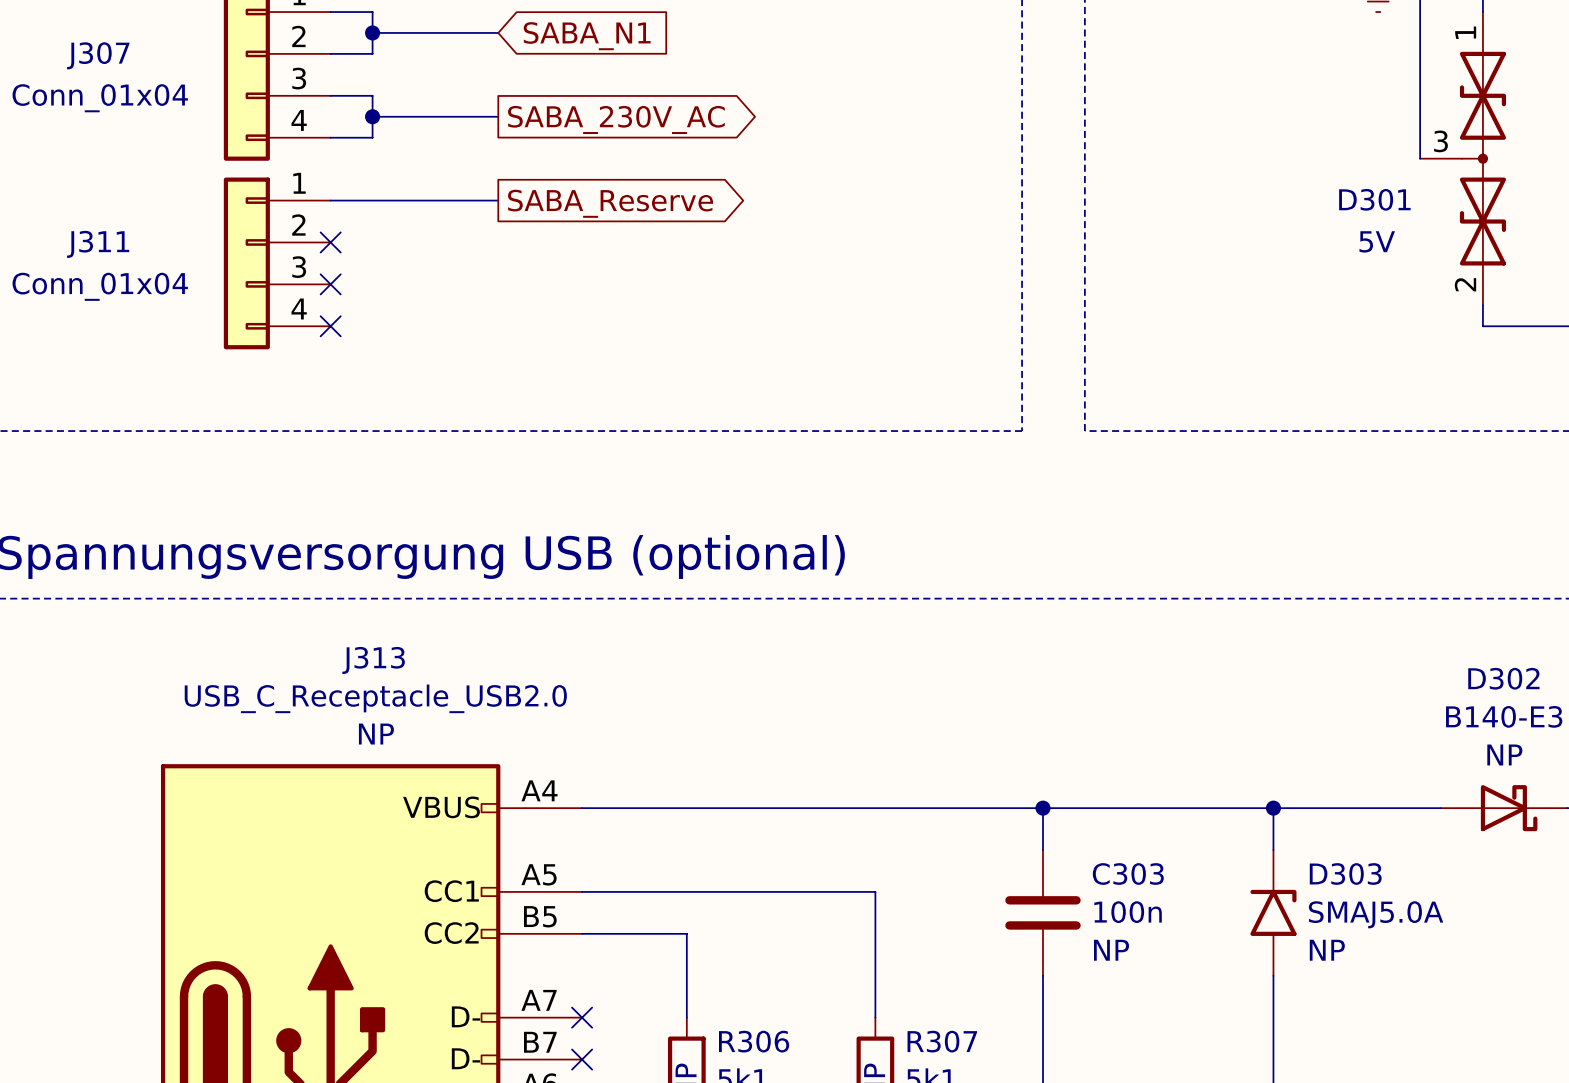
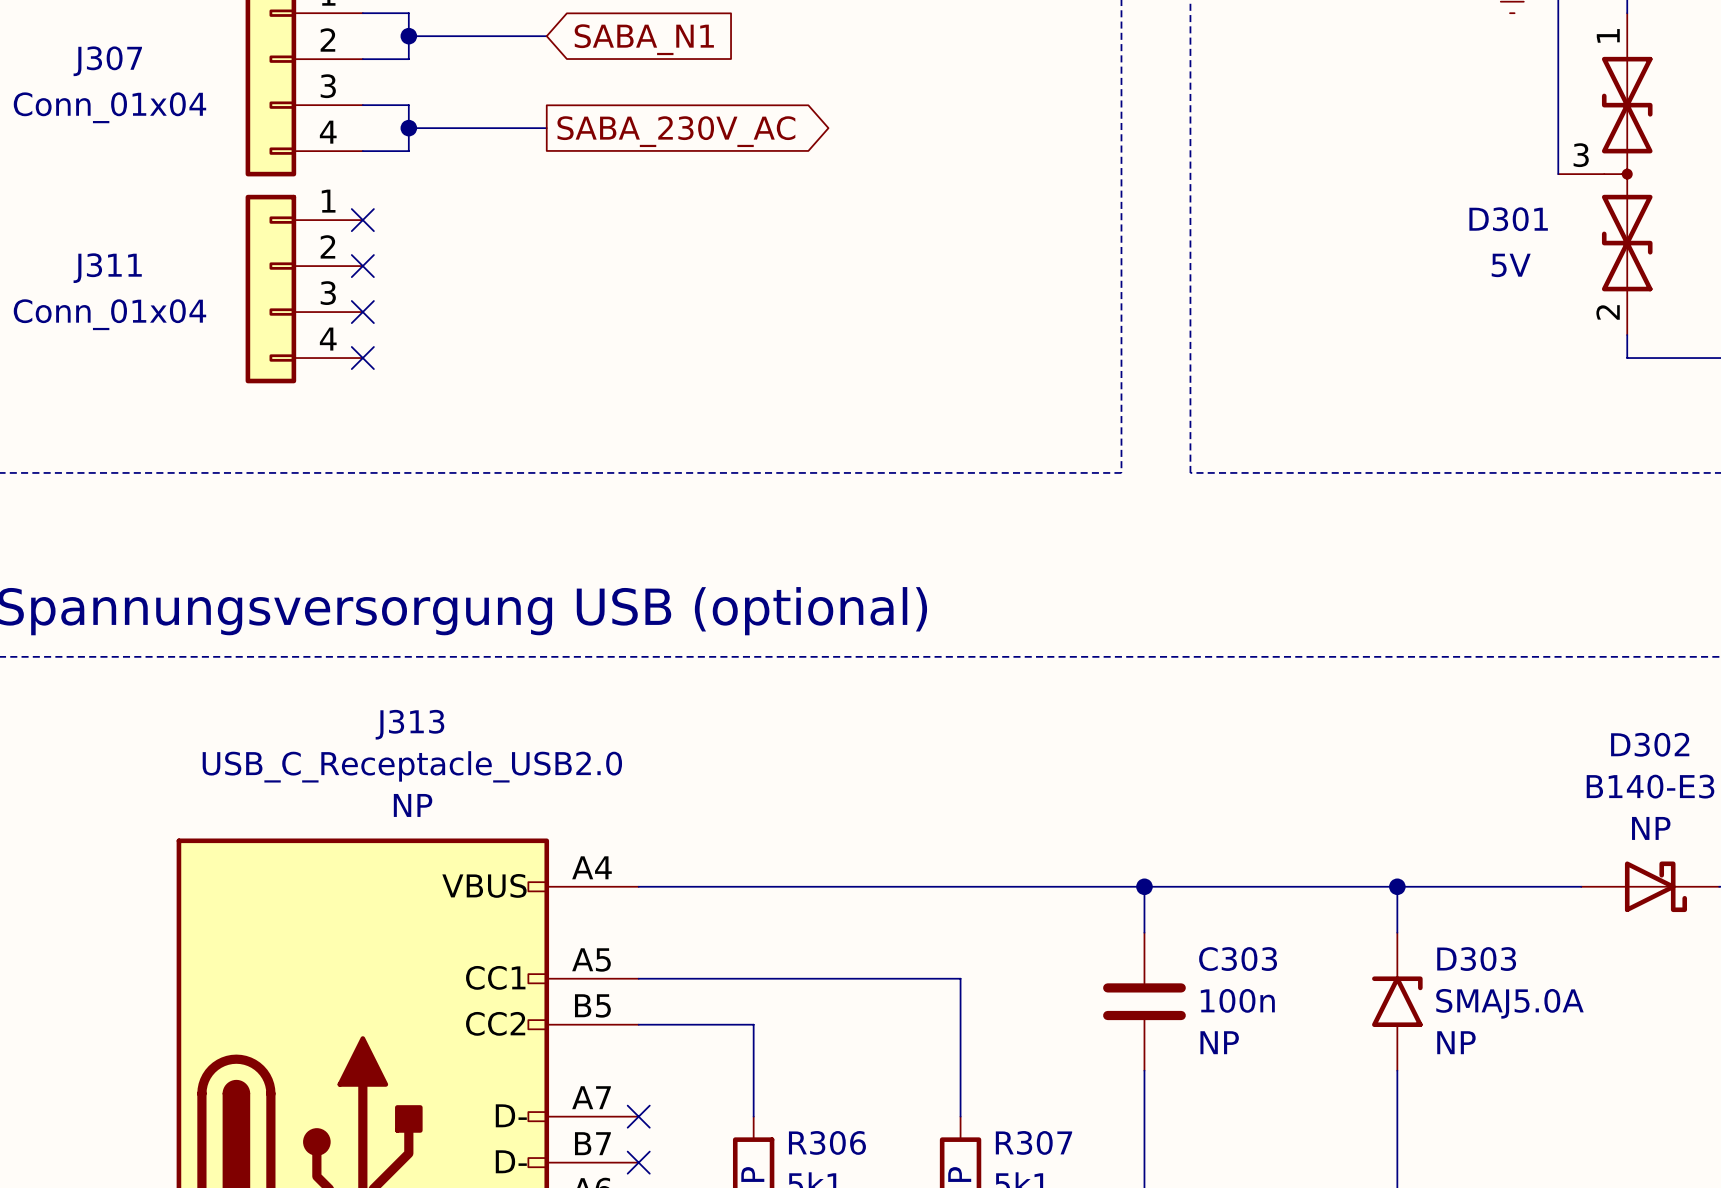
wire: (330, 200) (498, 200) -> none
no-connect mark: none -> (362, 220)
global label: SABA_Reserve (610, 203) -> none

